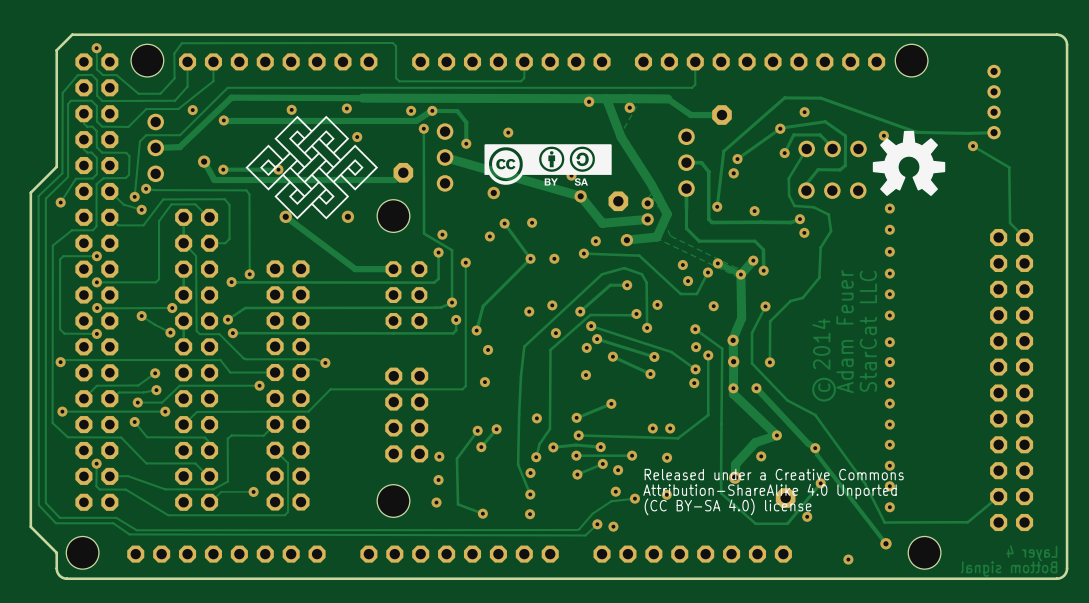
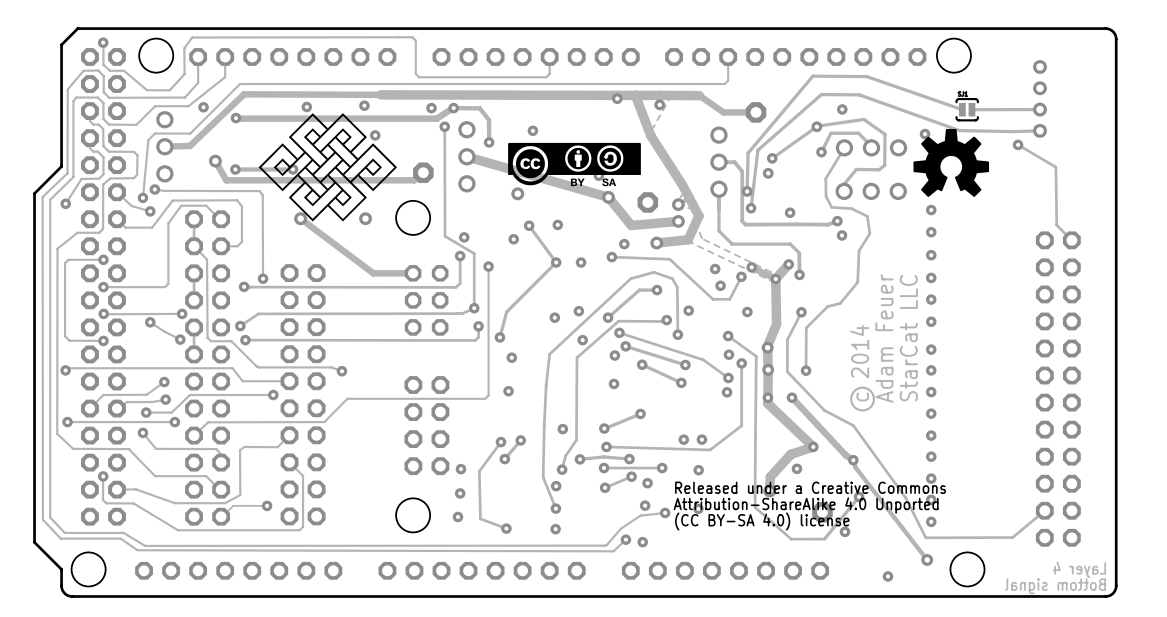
track: none -> (962, 109) (866, 76) (812, 76) (748, 153) (747, 191)
part: none -> (967, 109)
track: none -> (1040, 109) (971, 109)
via: none -> (747, 191)

